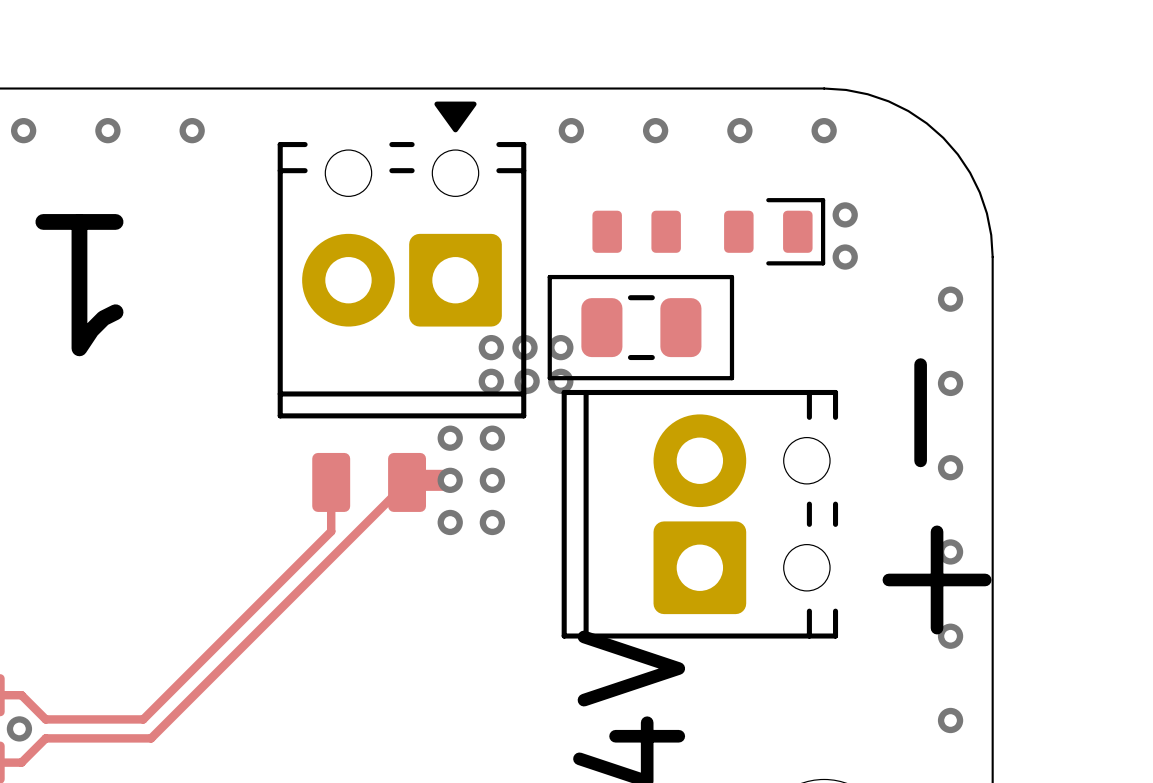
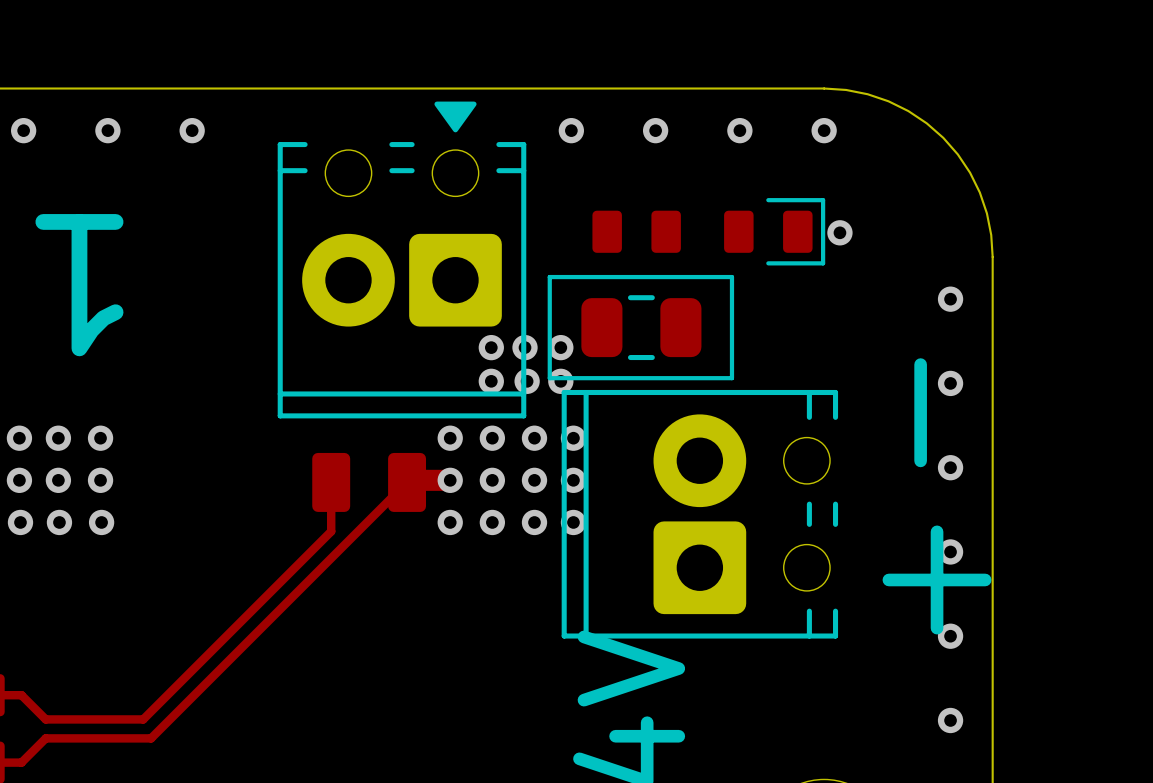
via: (845, 214) -> none
via: none -> (839, 232)
via: (845, 257) -> none
via: none -> (19, 438)
via: none -> (58, 438)
via: none -> (100, 438)
via: none -> (534, 438)
via: none -> (573, 438)
via: none -> (19, 480)
via: none -> (58, 480)
via: none -> (100, 480)
via: none -> (534, 480)
via: none -> (573, 480)
via: none -> (20, 522)
via: none -> (59, 522)
via: none -> (101, 522)
via: none -> (534, 522)
via: none -> (573, 522)
via: (19, 728) -> none

